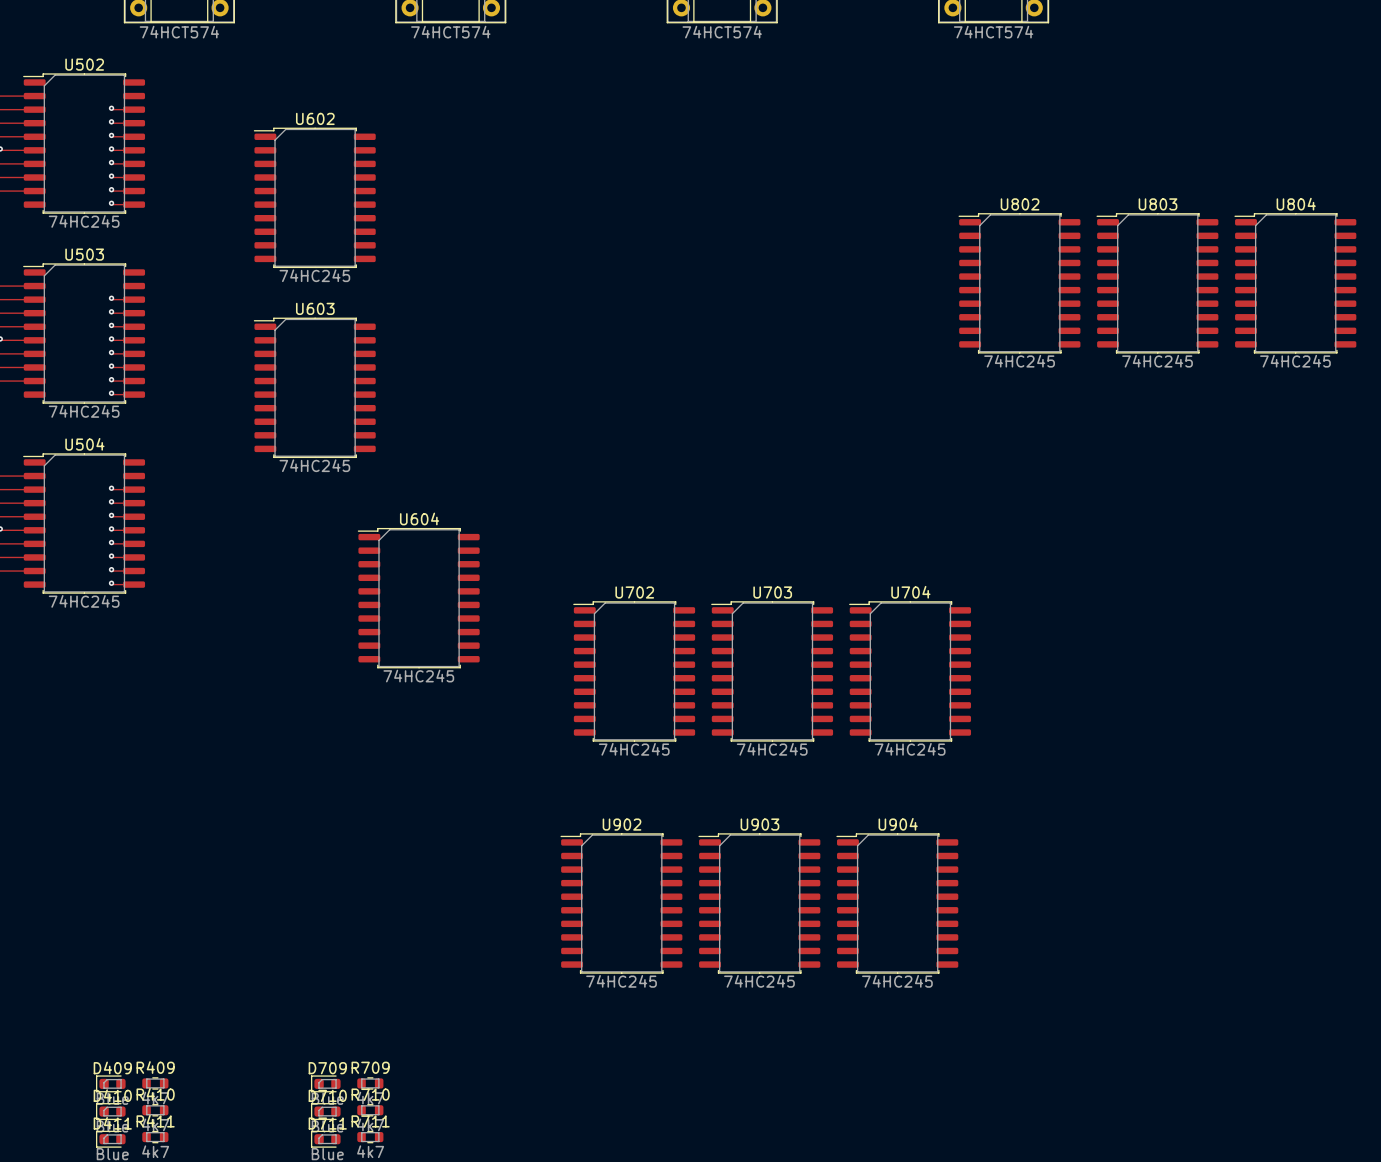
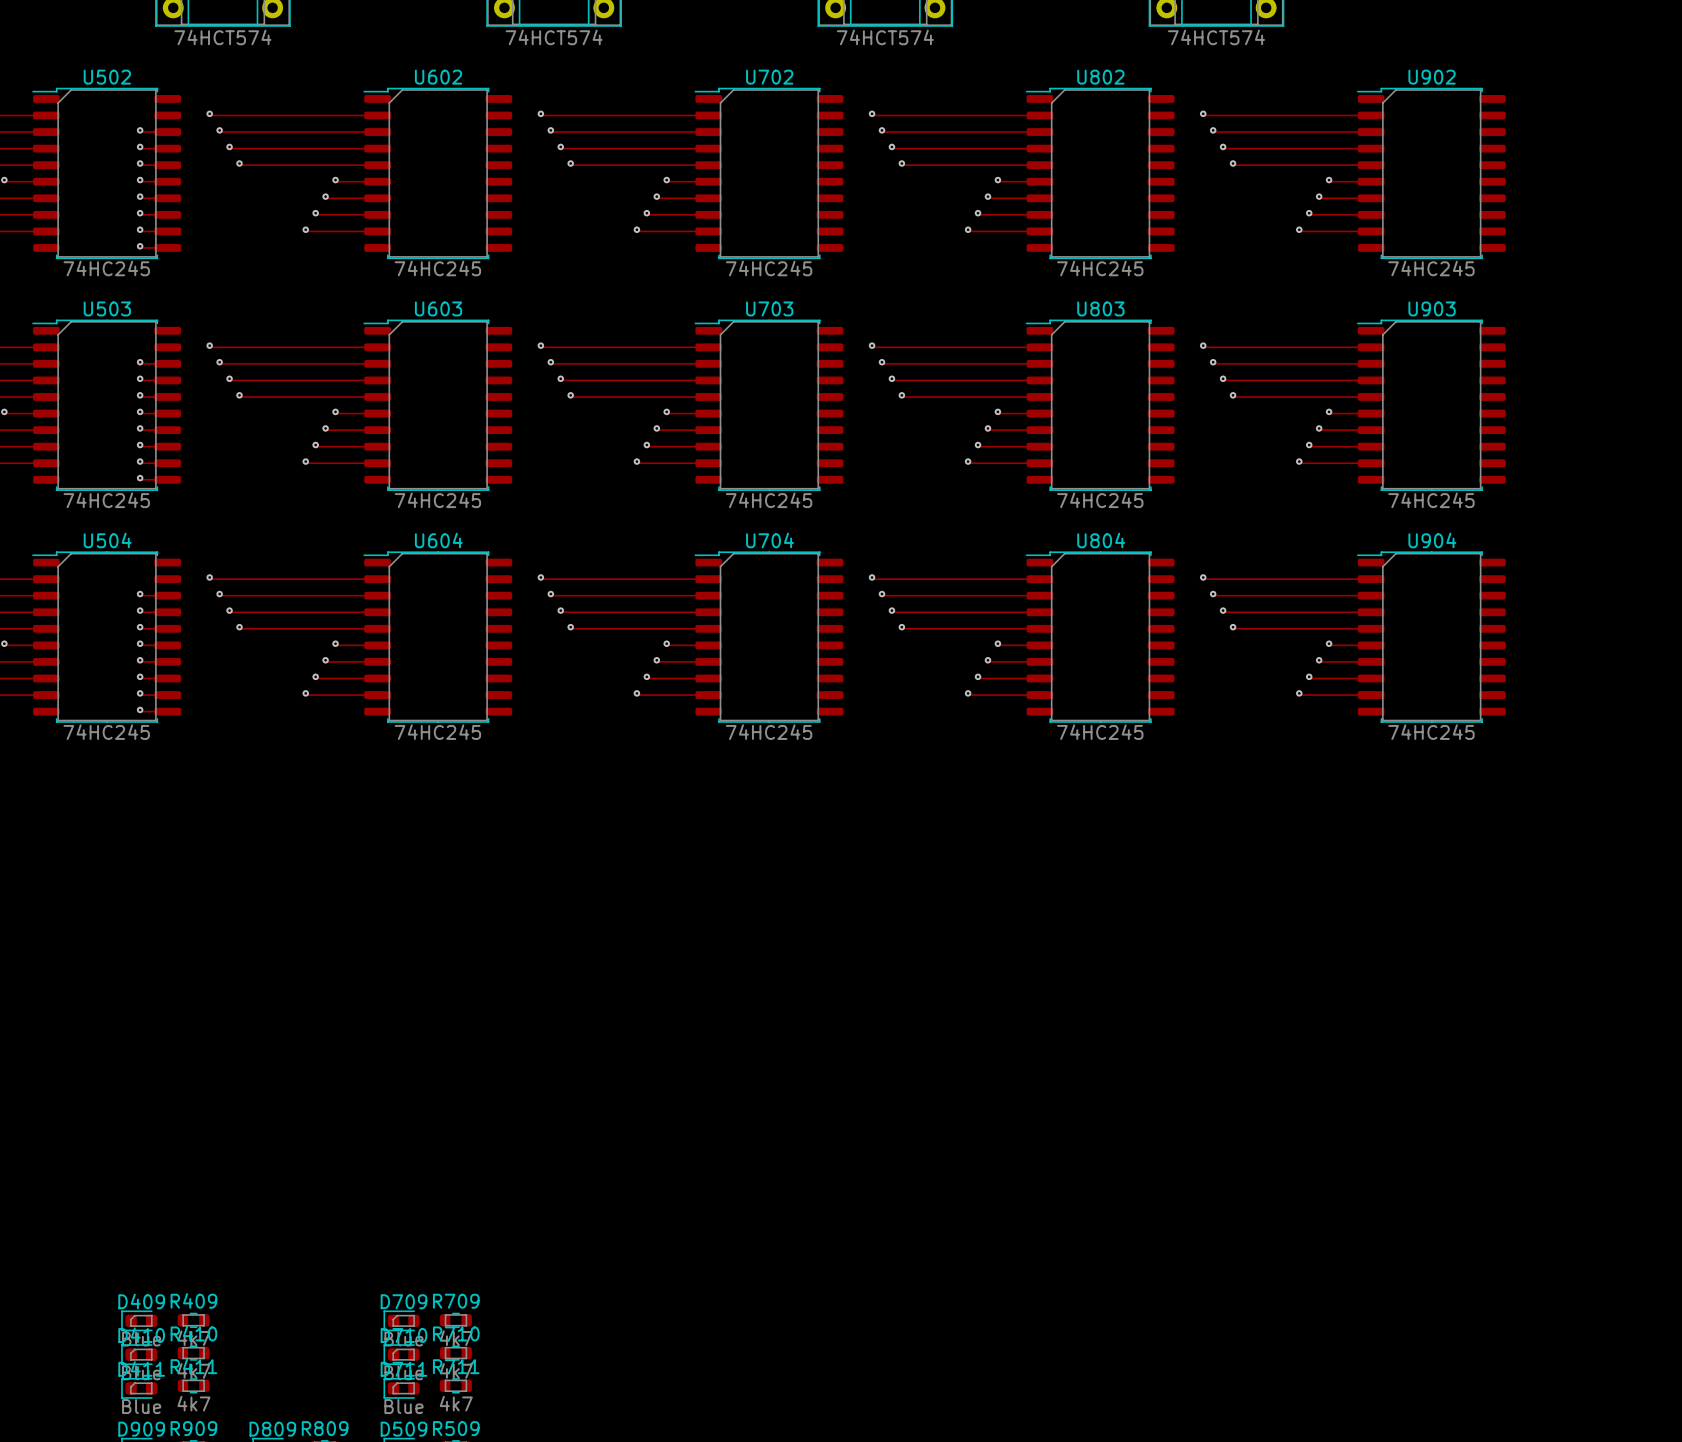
track: none -> (209, 113) (211, 115) (377, 115)
via: none -> (209, 113)
track: none -> (540, 113) (542, 115) (708, 115)
via: none -> (540, 113)
track: none -> (872, 113) (873, 115) (1039, 115)
via: none -> (872, 113)
track: none -> (1203, 113) (1204, 115) (1371, 115)
via: none -> (1203, 113)
track: none -> (219, 130) (221, 132) (377, 132)
via: none -> (219, 130)
track: none -> (550, 130) (552, 132) (708, 132)
via: none -> (550, 130)
track: none -> (881, 130) (883, 132) (1039, 132)
via: none -> (881, 130)
track: none -> (1213, 130) (1214, 132) (1371, 132)
via: none -> (1213, 130)
track: none -> (229, 146) (231, 148) (377, 148)
via: none -> (229, 146)
track: none -> (560, 146) (562, 148) (708, 148)
via: none -> (560, 146)
track: none -> (891, 146) (893, 148) (1039, 148)
via: none -> (891, 146)
track: none -> (1223, 146) (1224, 148) (1371, 148)
via: none -> (1223, 146)
track: none -> (239, 163) (241, 165) (377, 165)
via: none -> (239, 163)
track: none -> (570, 163) (572, 165) (708, 165)
via: none -> (570, 163)
track: none -> (901, 163) (903, 165) (1039, 165)
via: none -> (901, 163)
track: none -> (1233, 163) (1234, 165) (1371, 165)
via: none -> (1233, 163)
track: none -> (335, 180) (337, 181) (377, 181)
via: none -> (335, 180)
track: none -> (666, 180) (668, 181) (708, 181)
via: none -> (666, 180)
track: none -> (997, 180) (999, 181) (1039, 181)
via: none -> (997, 180)
track: none -> (1329, 180) (1330, 181) (1371, 181)
via: none -> (1329, 180)
track: none -> (325, 196) (327, 198) (377, 198)
via: none -> (325, 196)
track: none -> (656, 196) (658, 198) (708, 198)
via: none -> (656, 196)
track: none -> (987, 196) (989, 198) (1039, 198)
via: none -> (987, 196)
track: none -> (1319, 196) (1320, 198) (1371, 198)
via: none -> (1319, 196)
track: none -> (315, 213) (317, 214) (377, 214)
via: none -> (315, 213)
track: none -> (646, 213) (648, 214) (708, 214)
via: none -> (646, 213)
track: none -> (978, 213) (979, 214) (1039, 214)
via: none -> (978, 213)
track: none -> (1309, 213) (1310, 214) (1371, 214)
via: none -> (1309, 213)
track: none -> (305, 229) (307, 231) (377, 231)
via: none -> (305, 229)
track: none -> (636, 229) (638, 231) (708, 231)
via: none -> (636, 229)
track: none -> (968, 229) (969, 231) (1039, 231)
via: none -> (968, 229)
track: none -> (1299, 229) (1300, 231) (1371, 231)
via: none -> (1299, 229)
U602 position: (314, 197) -> (437, 173)
U802 position: (1019, 283) -> (1100, 173)
U803 position: (1157, 283) -> (1100, 405)
U804 position: (1295, 283) -> (1100, 637)
track: none -> (209, 345) (211, 347) (377, 347)
via: none -> (209, 345)
track: none -> (540, 345) (542, 347) (708, 347)
via: none -> (540, 345)
track: none -> (872, 345) (873, 347) (1039, 347)
via: none -> (872, 345)
track: none -> (1203, 345) (1204, 347) (1371, 347)
via: none -> (1203, 345)
track: none -> (219, 362) (221, 363) (377, 363)
via: none -> (219, 362)
track: none -> (550, 362) (552, 363) (708, 363)
via: none -> (550, 362)
track: none -> (881, 362) (883, 363) (1039, 363)
via: none -> (881, 362)
track: none -> (1213, 362) (1214, 363) (1371, 363)
via: none -> (1213, 362)
track: none -> (229, 378) (231, 380) (377, 380)
via: none -> (229, 378)
track: none -> (560, 378) (562, 380) (708, 380)
via: none -> (560, 378)
track: none -> (891, 378) (893, 380) (1039, 380)
via: none -> (891, 378)
track: none -> (1223, 378) (1224, 380) (1371, 380)
via: none -> (1223, 378)
track: none -> (239, 395) (241, 396) (377, 396)
via: none -> (239, 395)
track: none -> (570, 395) (572, 396) (708, 396)
via: none -> (570, 395)
track: none -> (901, 395) (903, 396) (1039, 396)
via: none -> (901, 395)
track: none -> (1233, 395) (1234, 396) (1371, 396)
via: none -> (1233, 395)
track: none -> (335, 411) (337, 413) (377, 413)
via: none -> (335, 411)
track: none -> (666, 411) (668, 413) (708, 413)
via: none -> (666, 411)
track: none -> (997, 411) (999, 413) (1039, 413)
via: none -> (997, 411)
track: none -> (1329, 411) (1330, 413) (1371, 413)
via: none -> (1329, 411)
track: none -> (325, 428) (327, 430) (377, 430)
via: none -> (325, 428)
track: none -> (656, 428) (658, 430) (708, 430)
via: none -> (656, 428)
track: none -> (987, 428) (989, 430) (1039, 430)
via: none -> (987, 428)
track: none -> (1319, 428) (1320, 430) (1371, 430)
via: none -> (1319, 428)
track: none -> (315, 445) (317, 446) (377, 446)
via: none -> (315, 445)
track: none -> (646, 445) (648, 446) (708, 446)
via: none -> (646, 445)
track: none -> (978, 445) (979, 446) (1039, 446)
via: none -> (978, 445)
track: none -> (1309, 445) (1310, 446) (1371, 446)
via: none -> (1309, 445)
track: none -> (305, 461) (307, 463) (377, 463)
via: none -> (305, 461)
track: none -> (636, 461) (638, 463) (708, 463)
via: none -> (636, 461)
track: none -> (968, 461) (969, 463) (1039, 463)
via: none -> (968, 461)
track: none -> (1299, 461) (1300, 463) (1371, 463)
via: none -> (1299, 461)
U603 position: (314, 387) -> (437, 405)
track: none -> (209, 577) (211, 579) (377, 579)
via: none -> (209, 577)
track: none -> (540, 577) (542, 579) (708, 579)
via: none -> (540, 577)
track: none -> (872, 577) (873, 579) (1039, 579)
via: none -> (872, 577)
track: none -> (1203, 577) (1204, 579) (1371, 579)
via: none -> (1203, 577)
track: none -> (219, 594) (221, 595) (377, 595)
via: none -> (219, 594)
track: none -> (550, 594) (552, 595) (708, 595)
via: none -> (550, 594)
track: none -> (881, 594) (883, 595) (1039, 595)
via: none -> (881, 594)
track: none -> (1213, 594) (1214, 595) (1371, 595)
via: none -> (1213, 594)
track: none -> (229, 610) (231, 612) (377, 612)
via: none -> (229, 610)
track: none -> (560, 610) (562, 612) (708, 612)
via: none -> (560, 610)
track: none -> (891, 610) (893, 612) (1039, 612)
via: none -> (891, 610)
track: none -> (1223, 610) (1224, 612) (1371, 612)
via: none -> (1223, 610)
track: none -> (239, 627) (241, 628) (377, 628)
via: none -> (239, 627)
track: none -> (570, 627) (572, 628) (708, 628)
via: none -> (570, 627)
track: none -> (901, 627) (903, 628) (1039, 628)
via: none -> (901, 627)
track: none -> (1233, 627) (1234, 628) (1371, 628)
via: none -> (1233, 627)
track: none -> (335, 643) (337, 645) (377, 645)
via: none -> (335, 643)
track: none -> (666, 643) (668, 645) (708, 645)
via: none -> (666, 643)
track: none -> (997, 643) (999, 645) (1039, 645)
via: none -> (997, 643)
track: none -> (1329, 643) (1330, 645) (1371, 645)
via: none -> (1329, 643)
track: none -> (325, 660) (327, 661) (377, 661)
via: none -> (325, 660)
track: none -> (656, 660) (658, 661) (708, 661)
via: none -> (656, 660)
track: none -> (987, 660) (989, 661) (1039, 661)
via: none -> (987, 660)
track: none -> (1319, 660) (1320, 661) (1371, 661)
via: none -> (1319, 660)
track: none -> (315, 676) (317, 678) (377, 678)
via: none -> (315, 676)
track: none -> (646, 676) (648, 678) (708, 678)
via: none -> (646, 676)
track: none -> (978, 676) (979, 678) (1039, 678)
via: none -> (978, 676)
track: none -> (1309, 676) (1310, 678) (1371, 678)
via: none -> (1309, 676)
track: none -> (305, 693) (307, 695) (377, 695)
via: none -> (305, 693)
track: none -> (636, 693) (638, 695) (708, 695)
via: none -> (636, 693)
track: none -> (968, 693) (969, 695) (1039, 695)
via: none -> (968, 693)
track: none -> (1299, 693) (1300, 695) (1371, 695)
via: none -> (1299, 693)
U604 position: (418, 598) -> (437, 637)
U702 position: (634, 671) -> (768, 173)
U703 position: (772, 671) -> (768, 405)
U704 position: (910, 671) -> (768, 637)
U902 position: (621, 903) -> (1431, 173)
U903 position: (759, 903) -> (1431, 405)
U904 position: (897, 903) -> (1431, 637)

